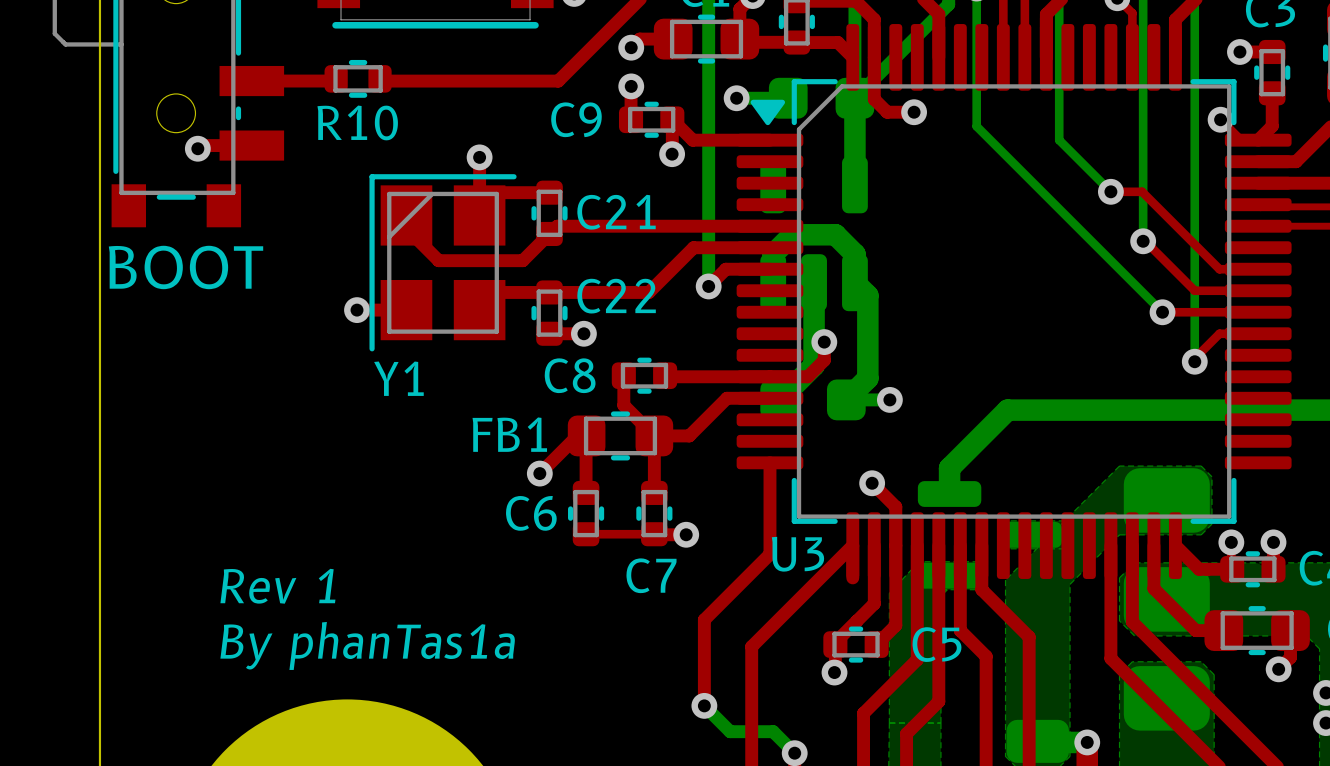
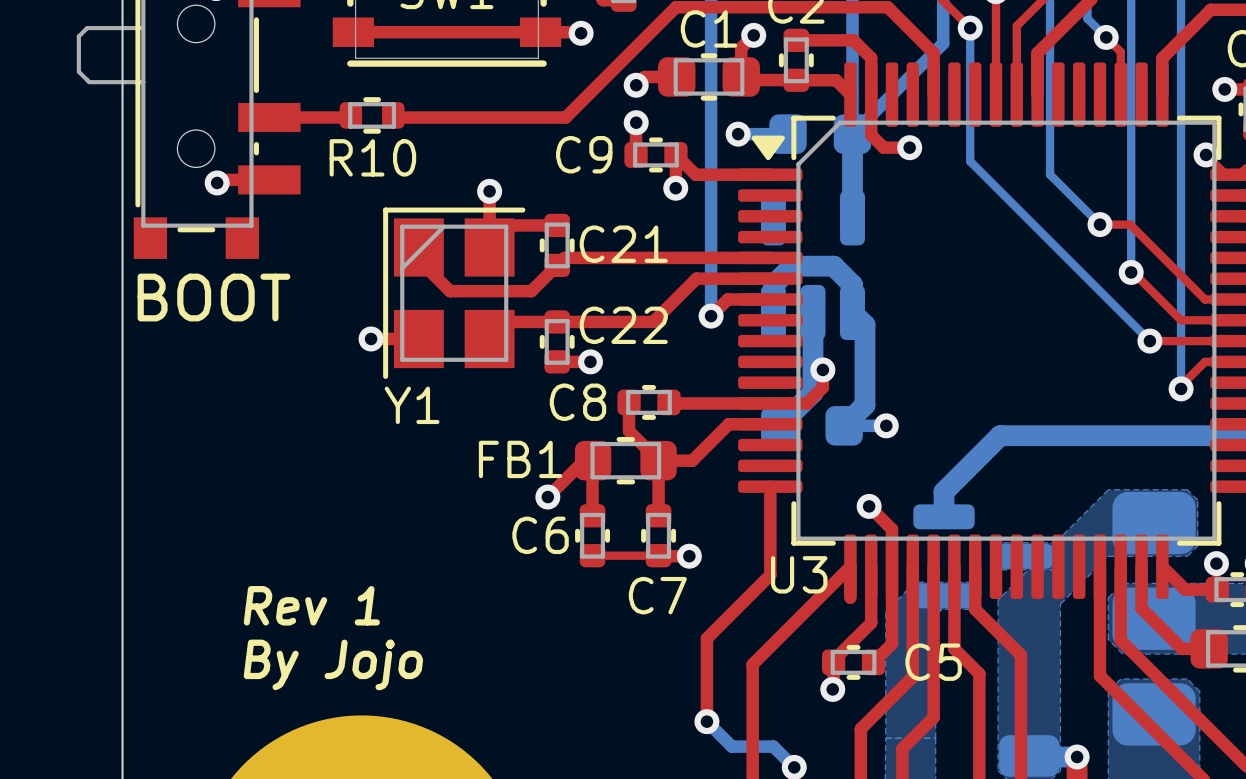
text: By phanTas1a (367, 645) -> By Jojo (333, 664)

